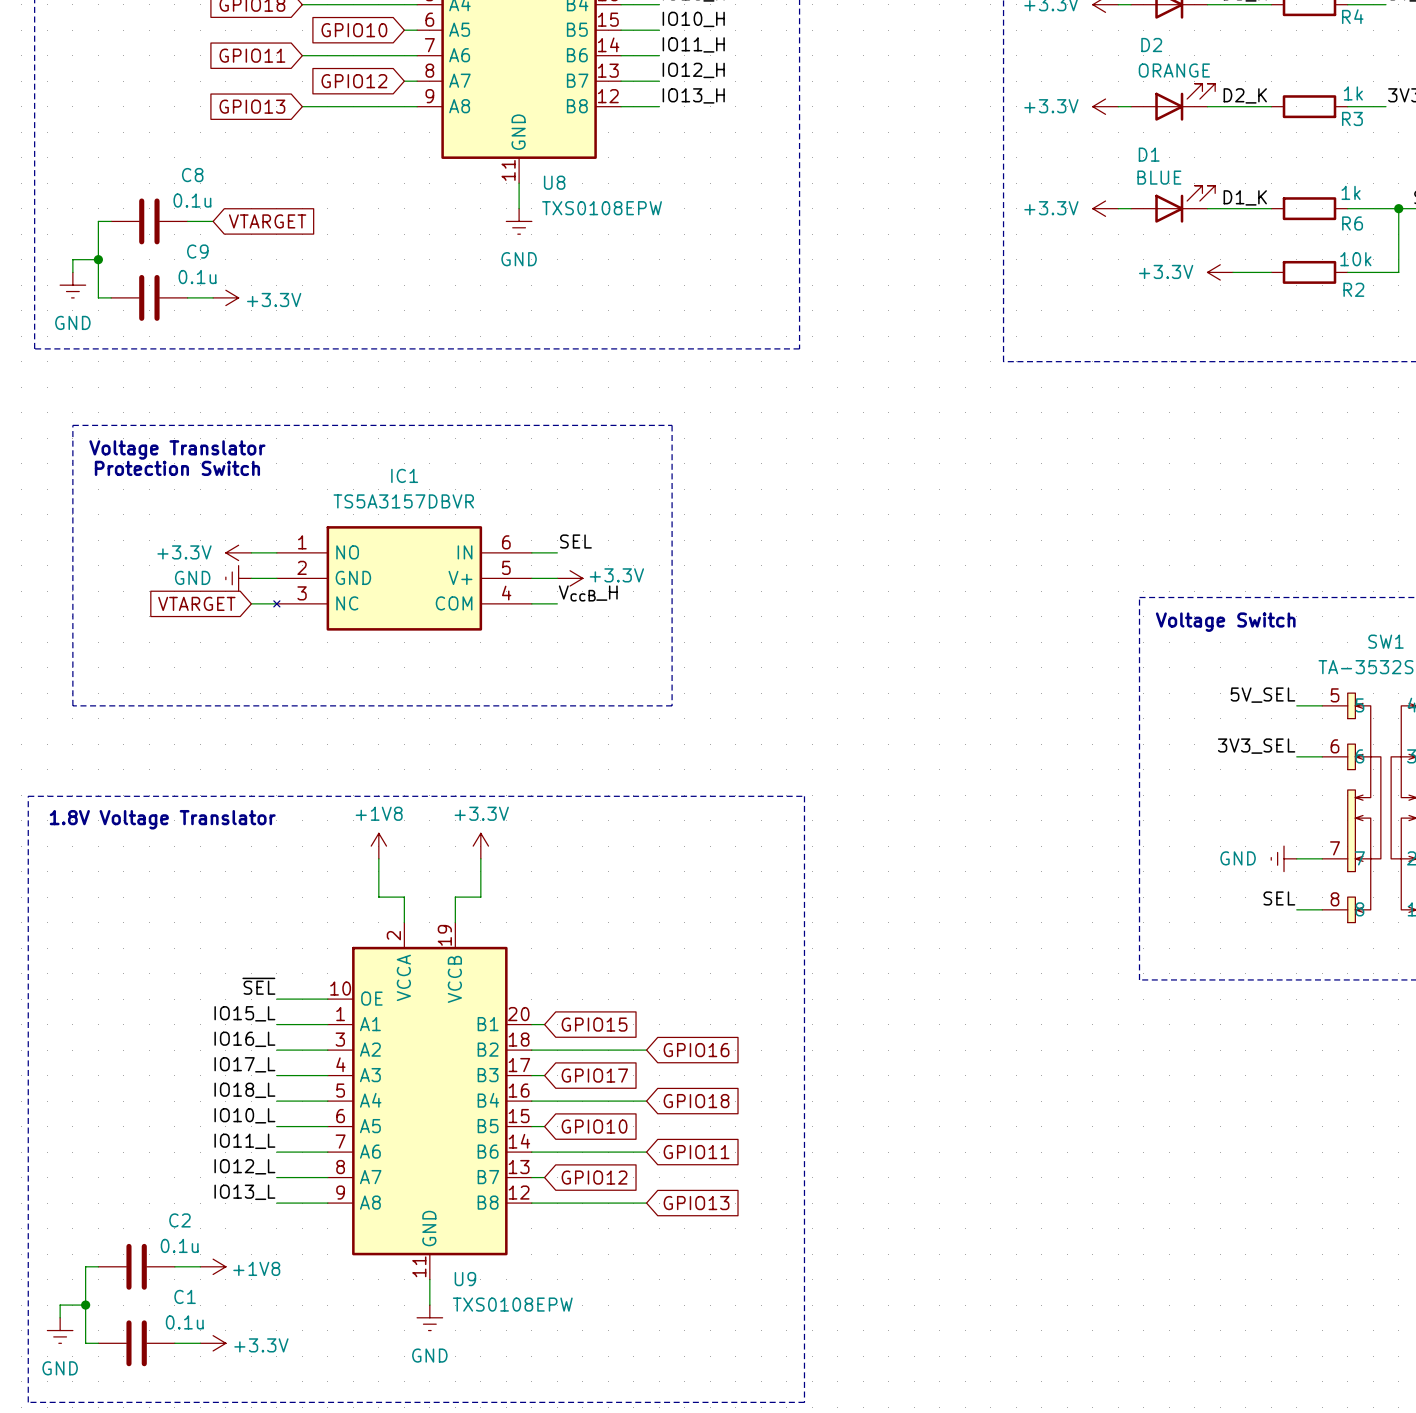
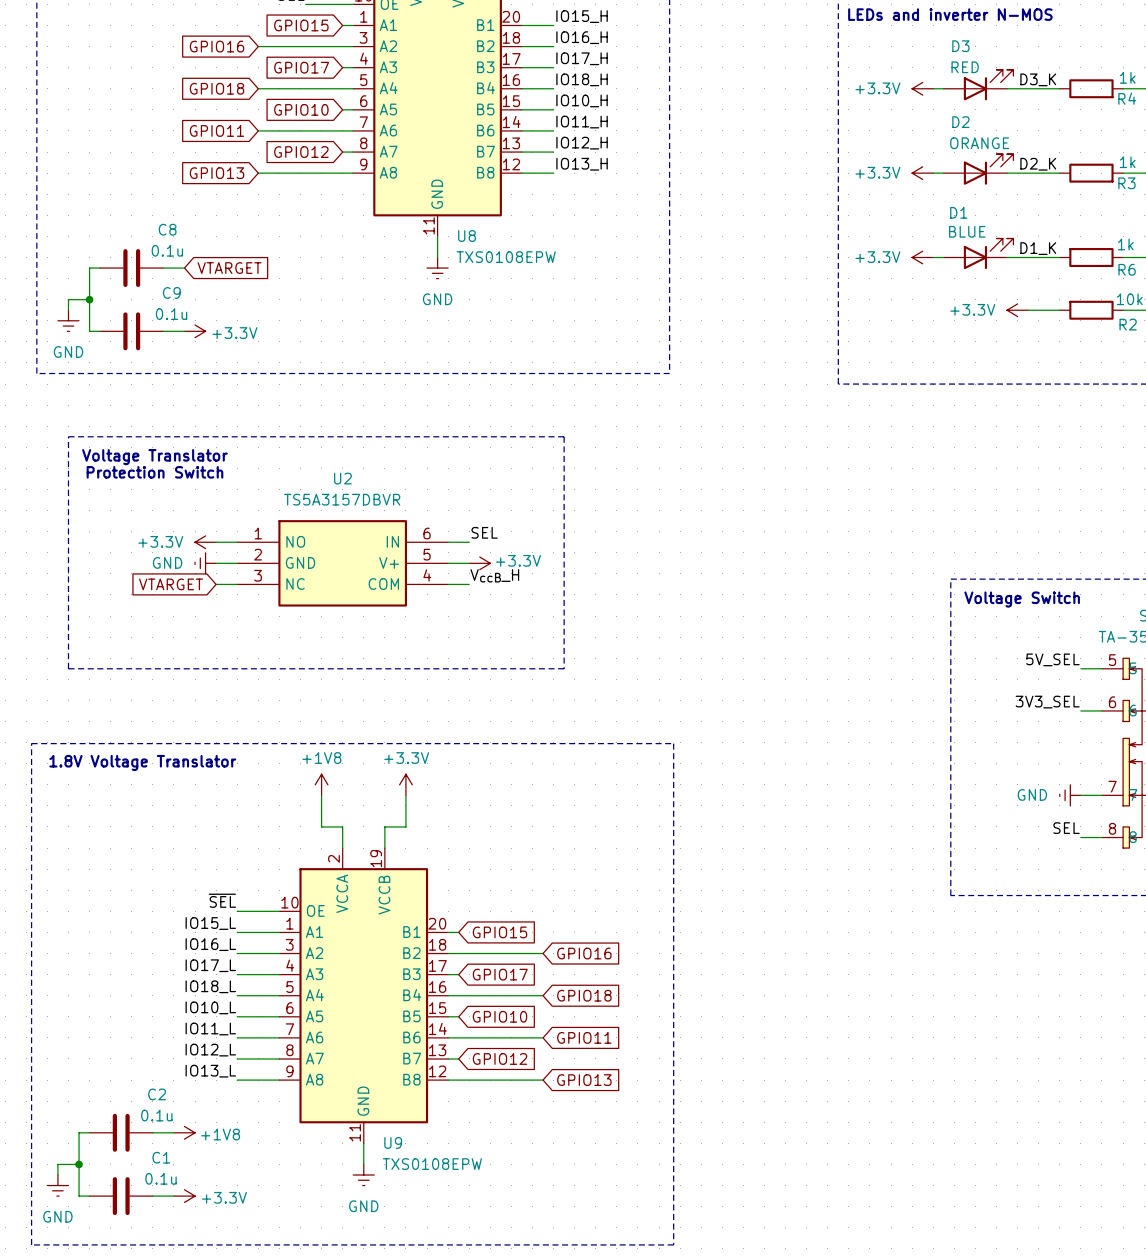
IC1: TS5A3157DBVR (402, 578) -> none
U2: none -> TS5A3157DBVR (342, 563)

